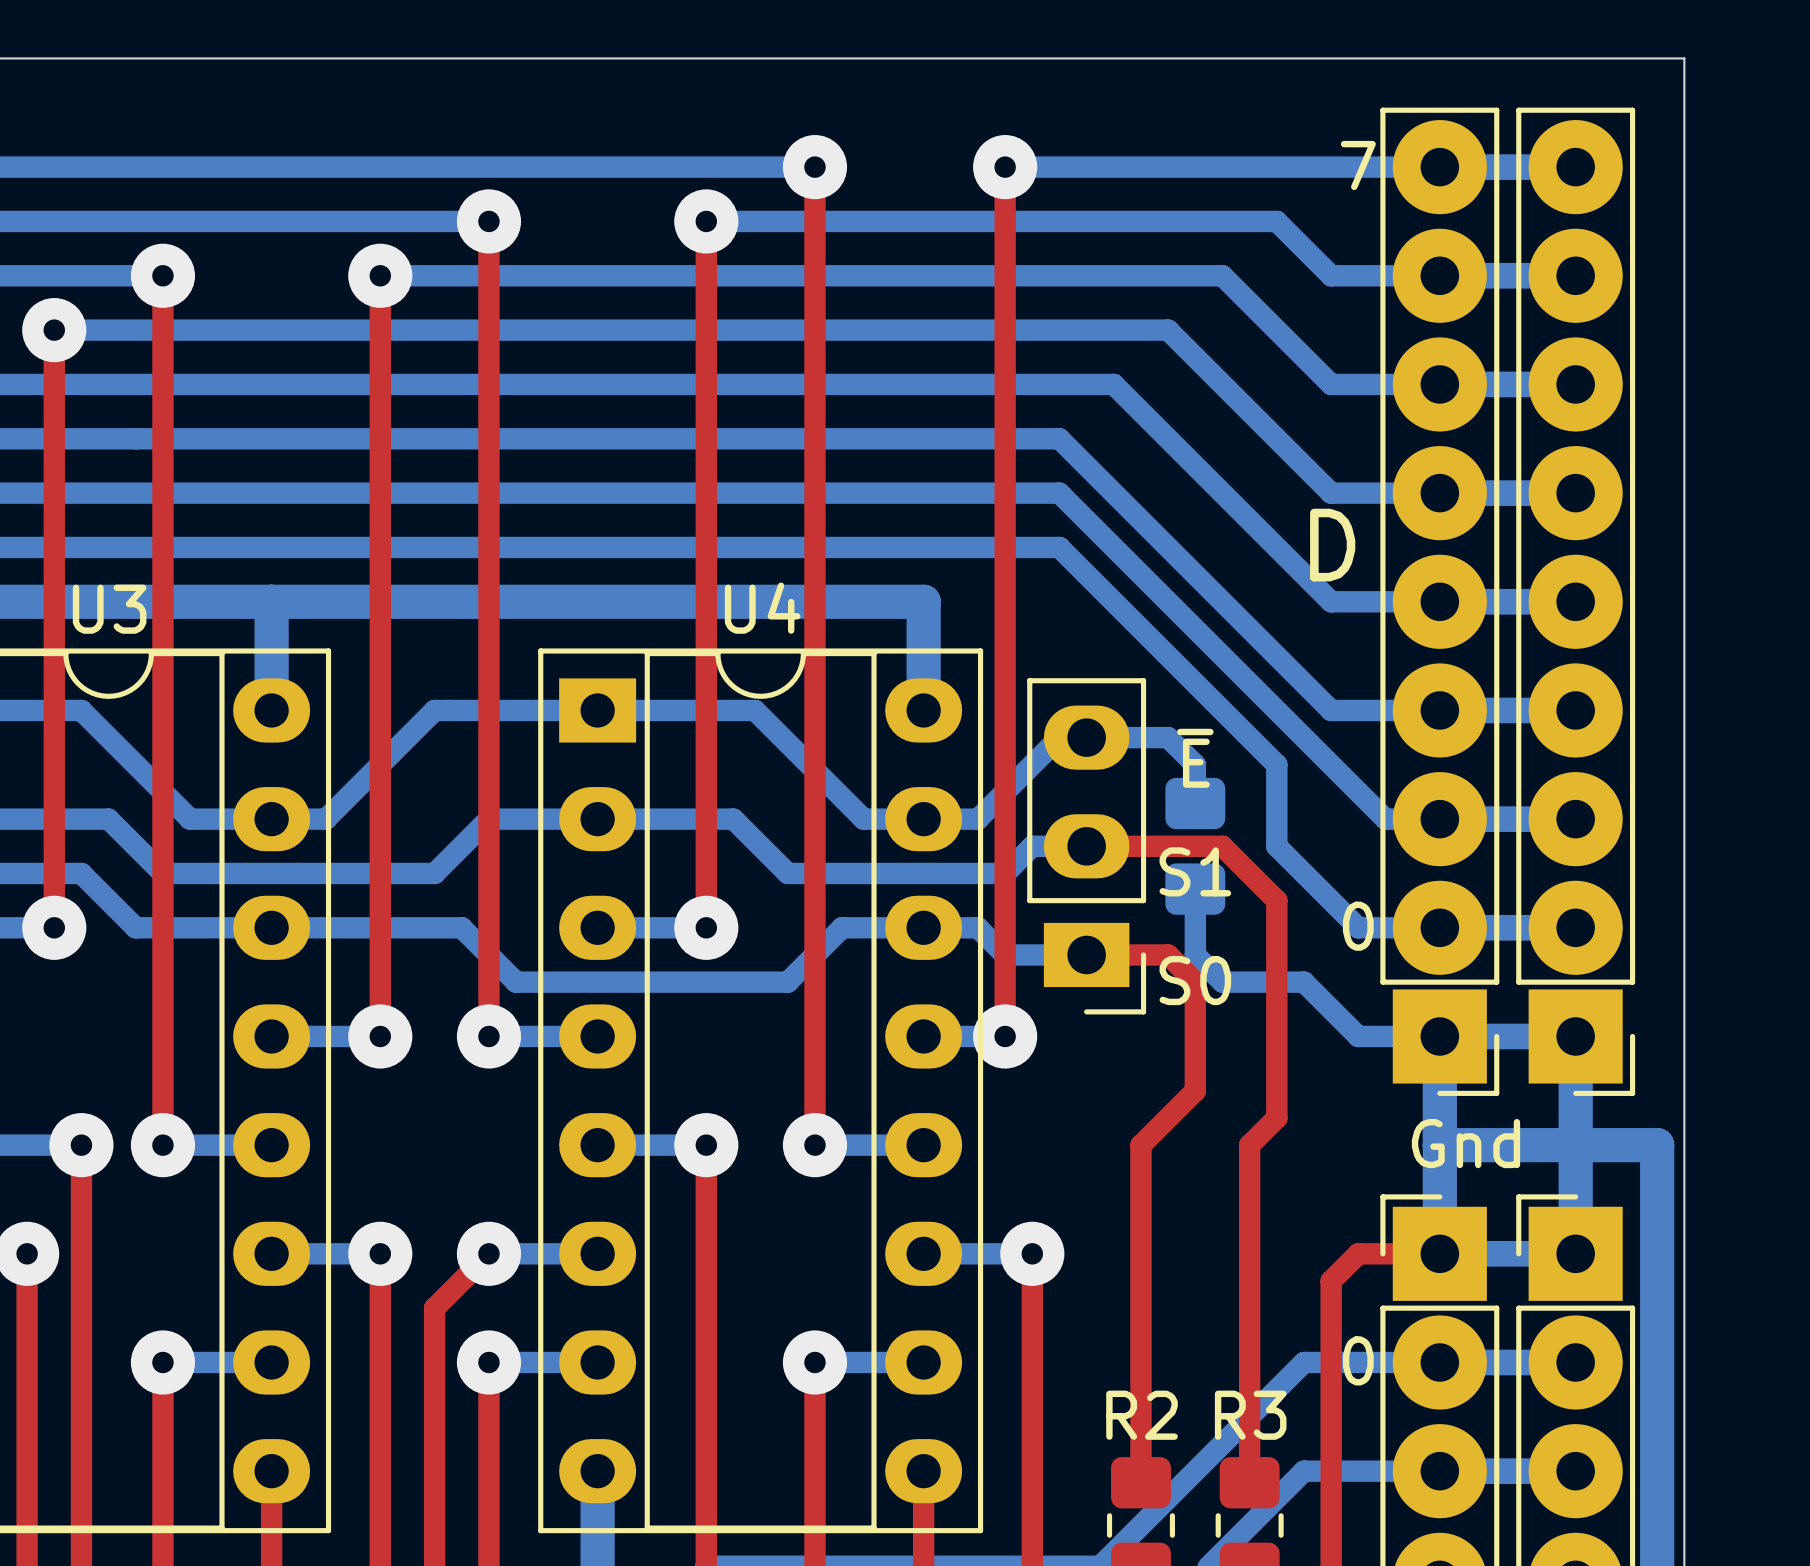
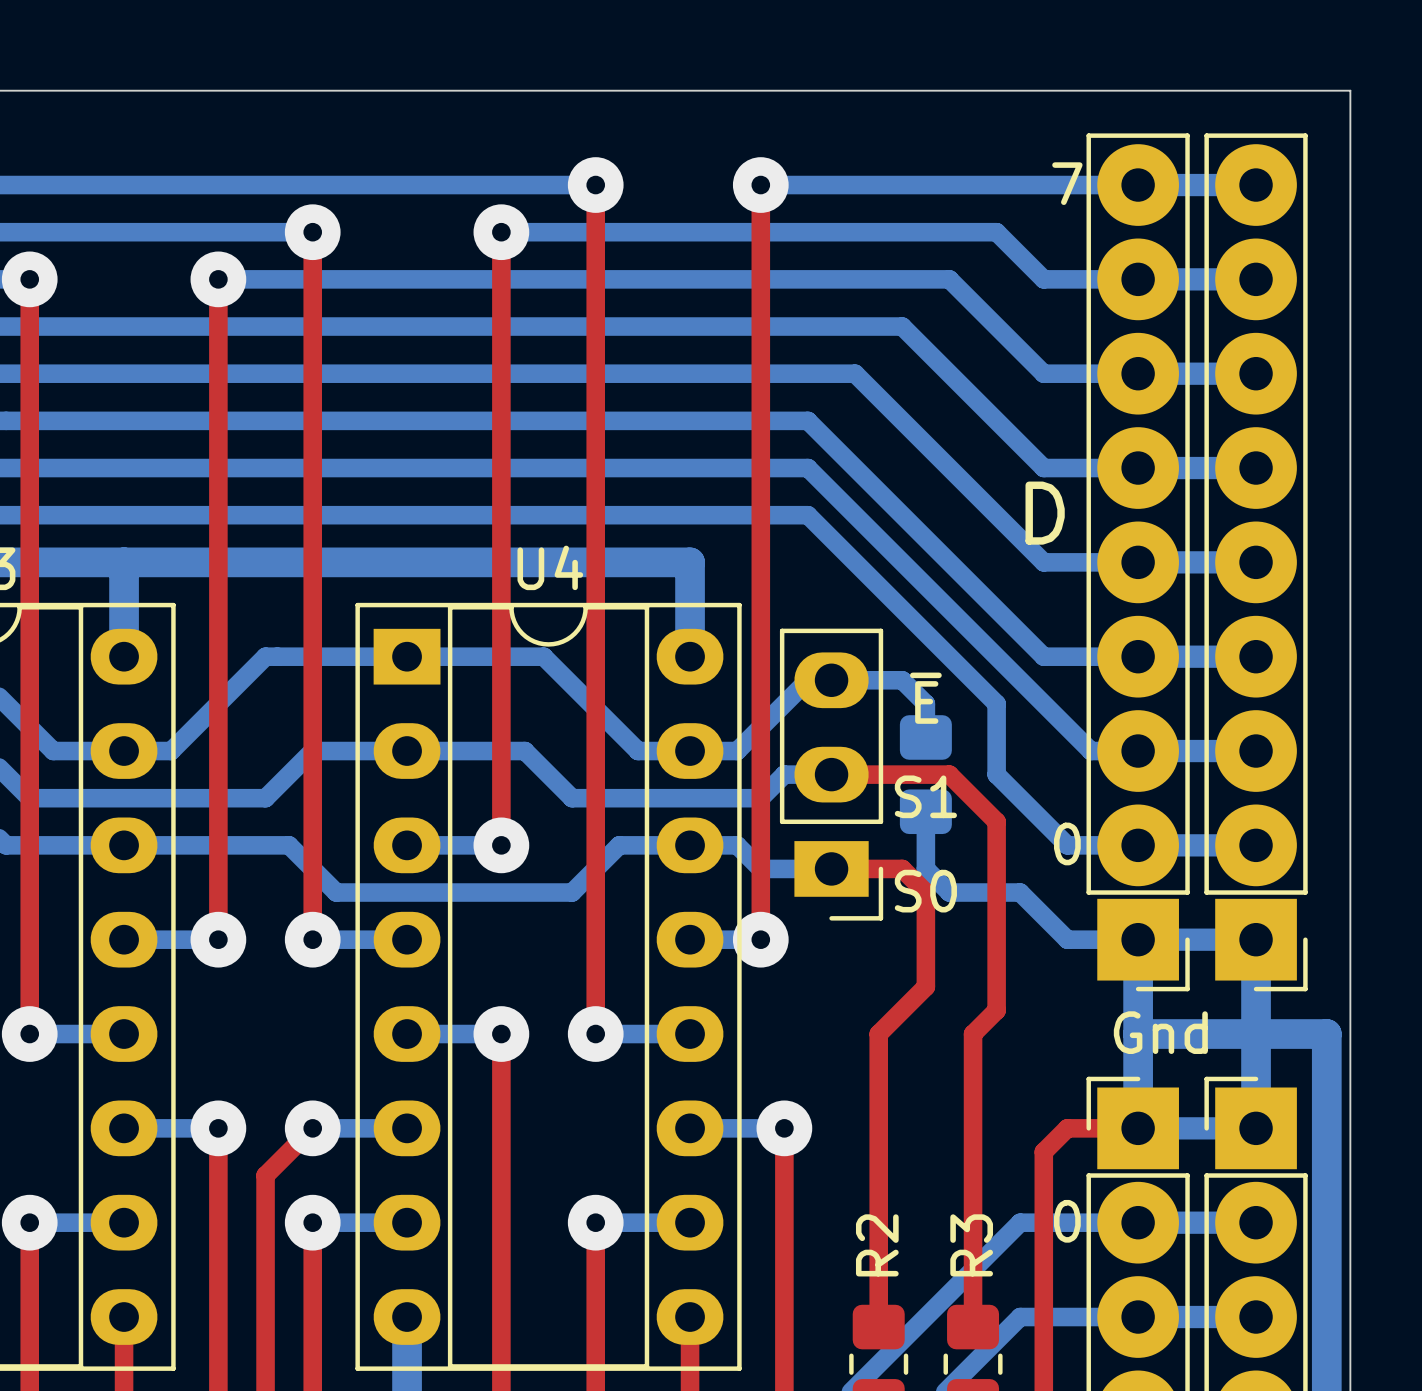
R2 name rotation: 0° (1142, 1415) -> 90° counterclockwise (877, 1245)
R3 name rotation: 0° (1250, 1415) -> 90° counterclockwise (971, 1245)

